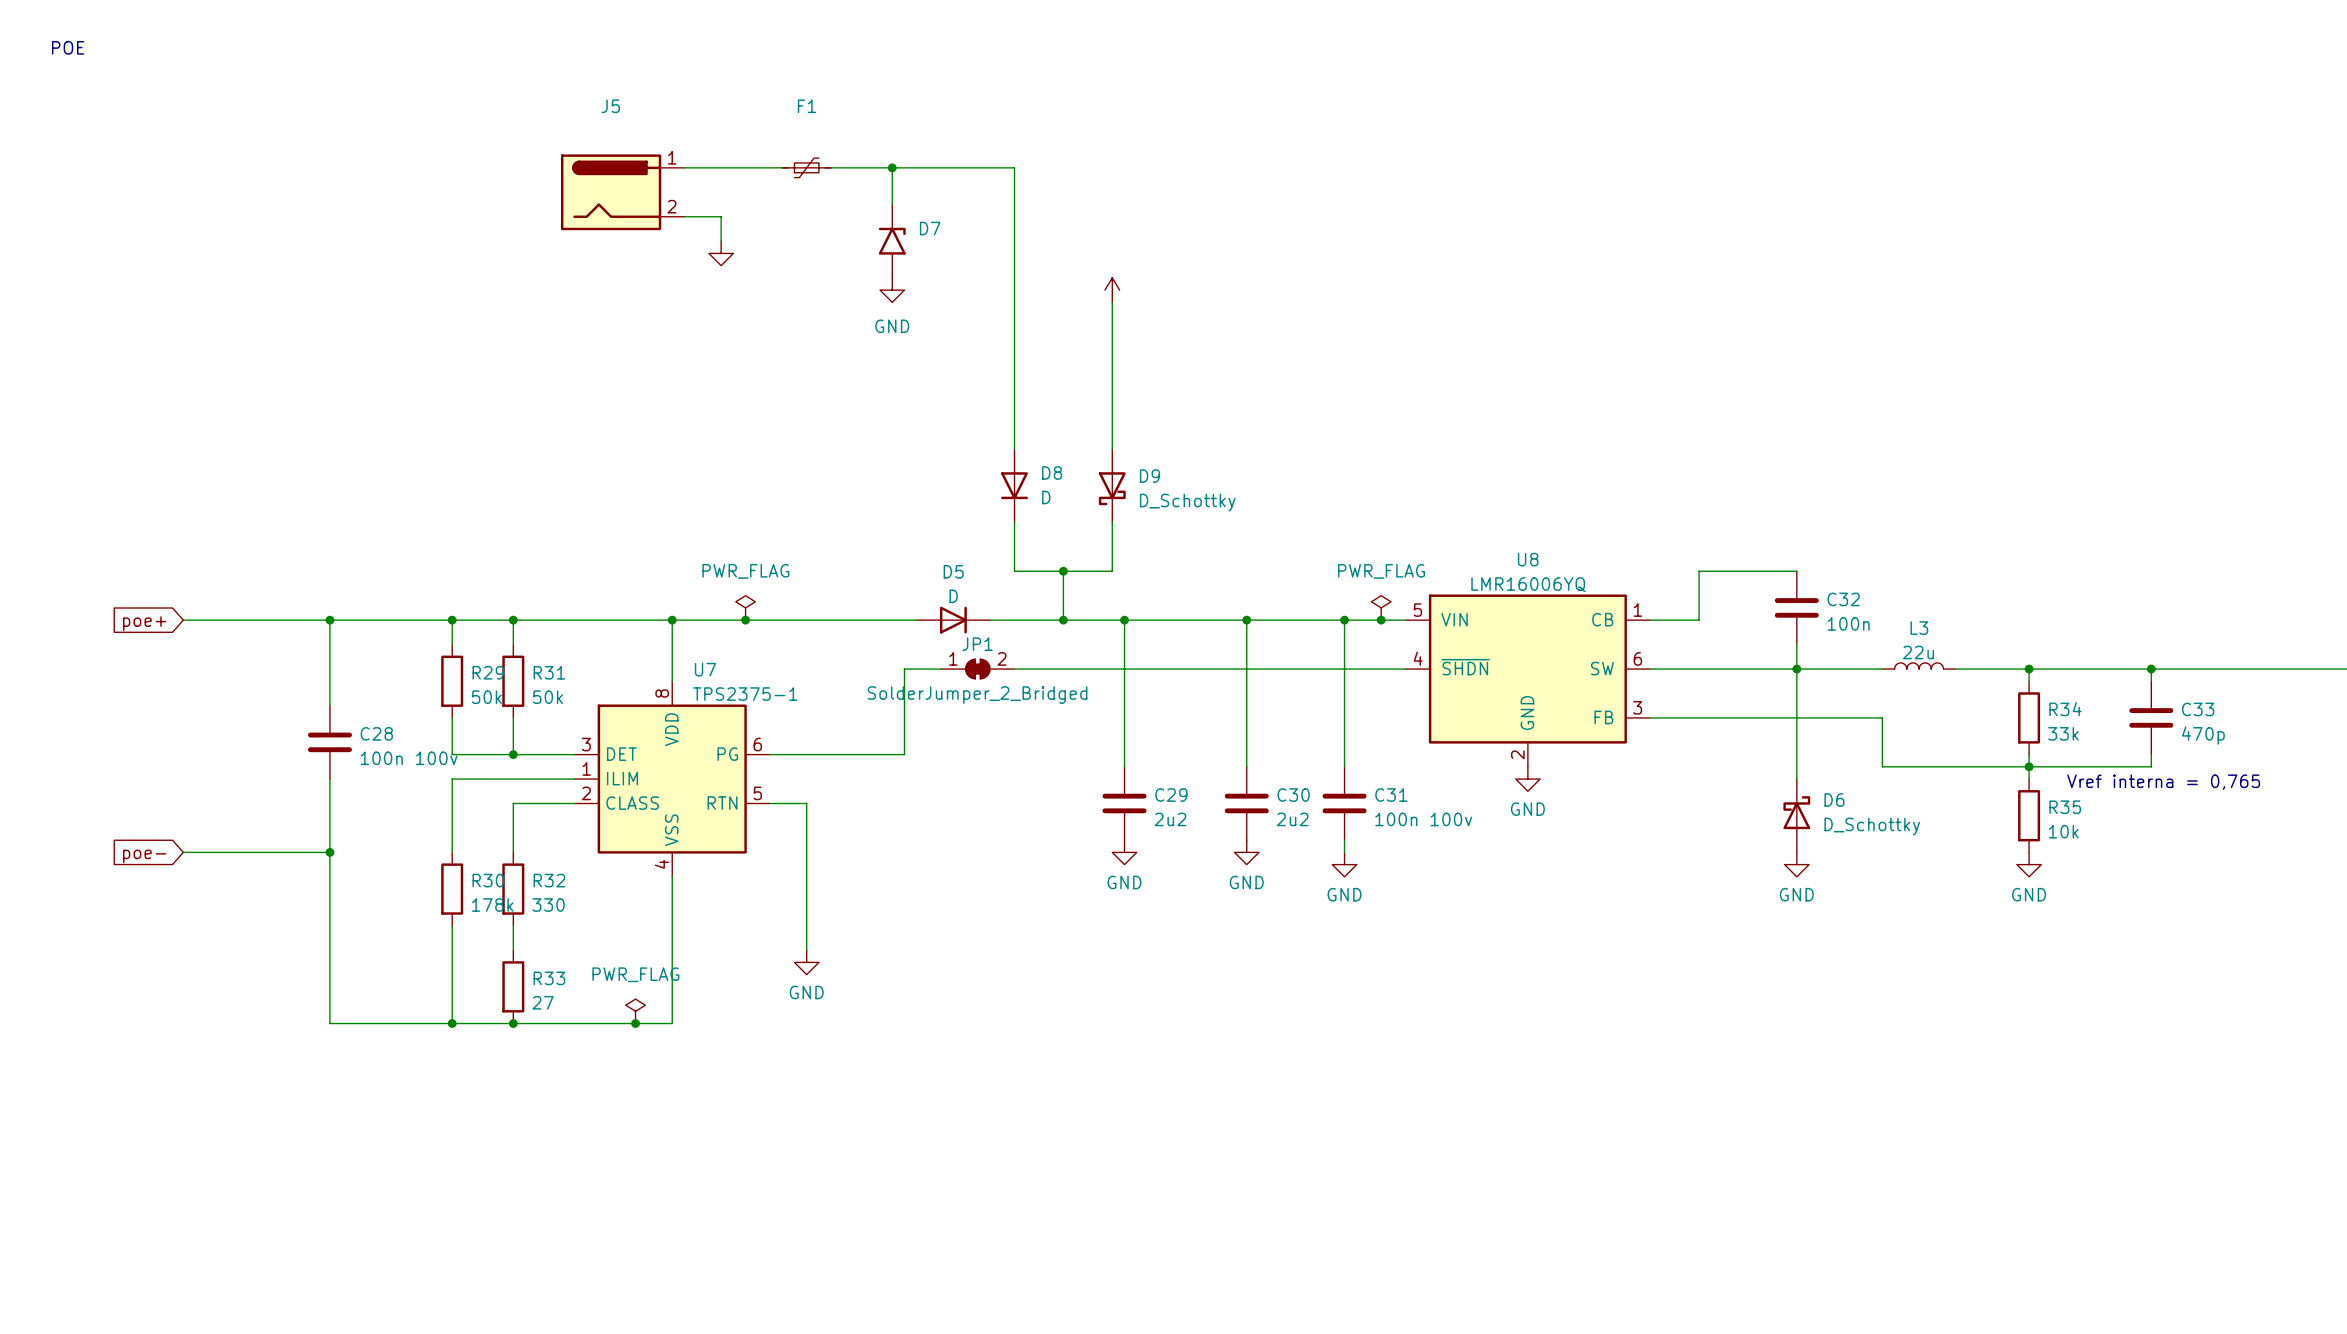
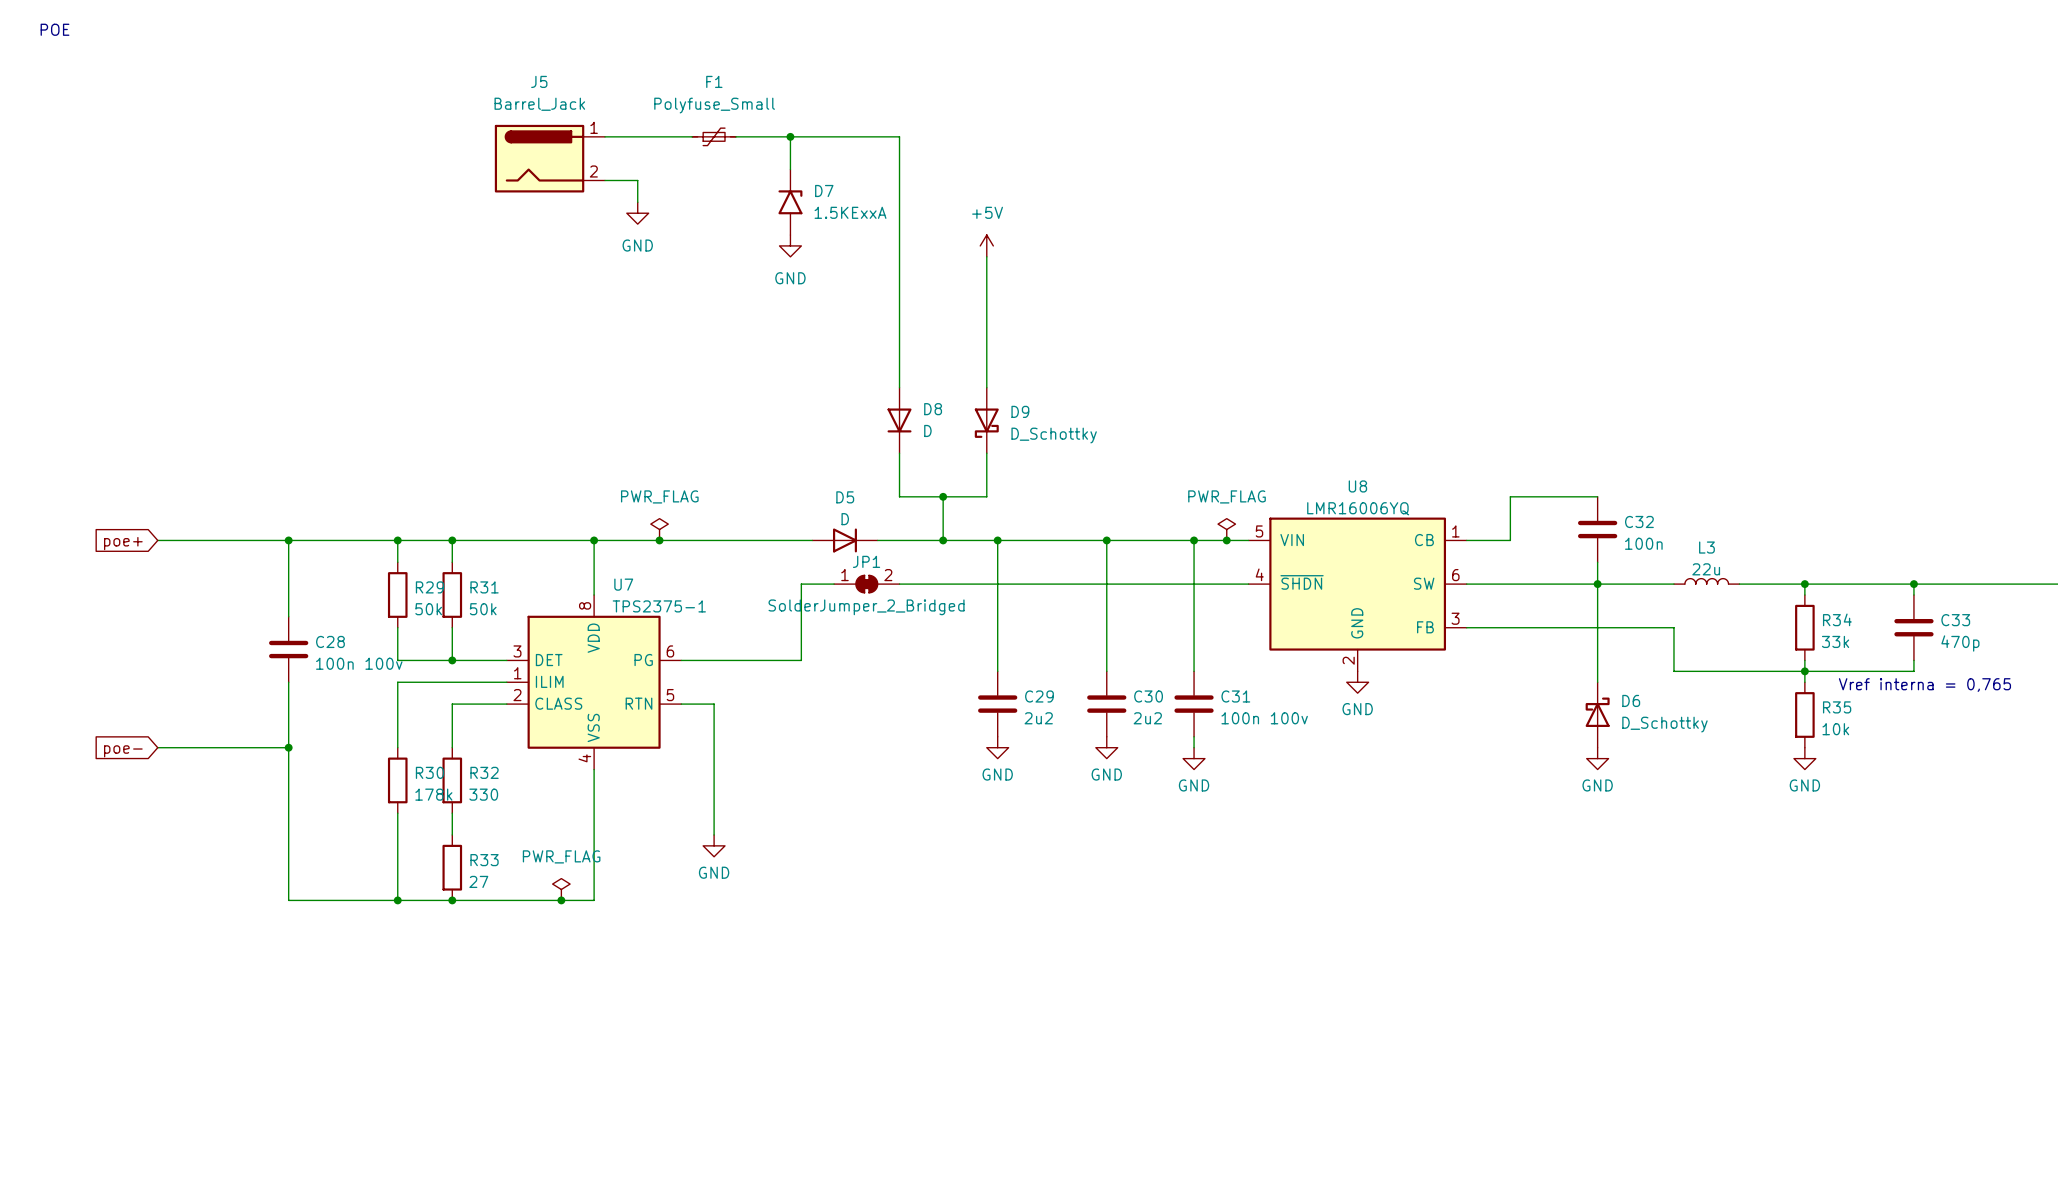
J5 value: none -> Barrel_Jack (539, 104)
F1 value: none -> Polyfuse_Small (714, 105)
D7 value: none -> 1.5KExxA (850, 212)
power symbol text: none -> +5V (987, 212)
power symbol text: none -> GND (637, 245)

